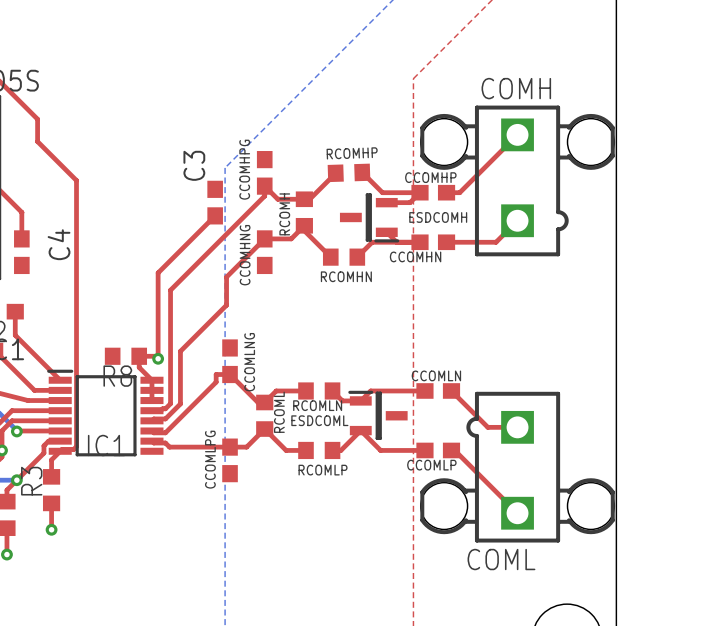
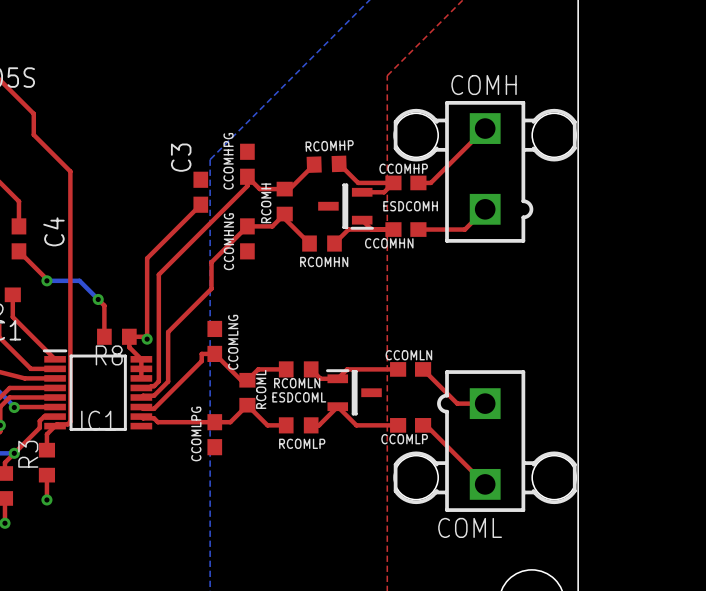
top track: none -> (18, 251) (46, 280)
bottom track: none -> (46, 280) (79, 280) (98, 299)
via: none -> (46, 280)
top track: none -> (98, 299) (104, 305) (104, 336)
via: none -> (98, 299)

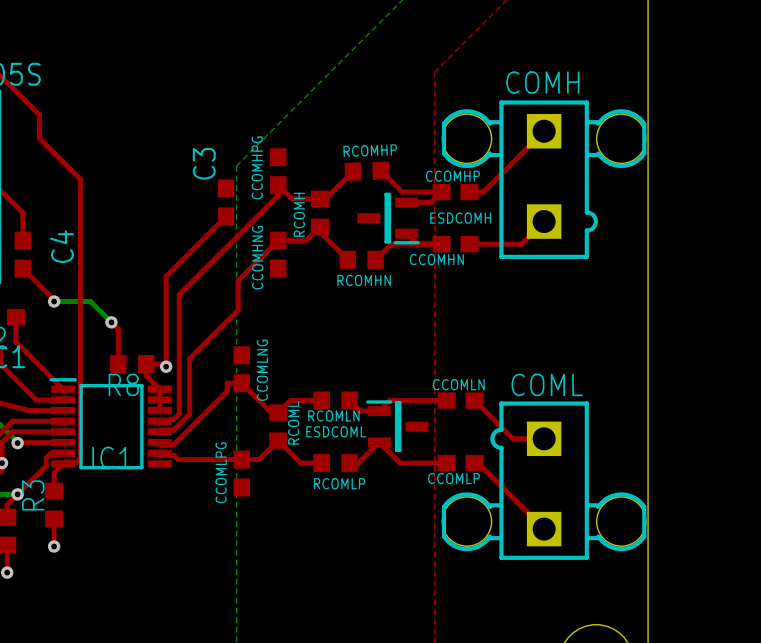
text: none -> COML (547, 384)
COML name: COML (470, 527) -> none

